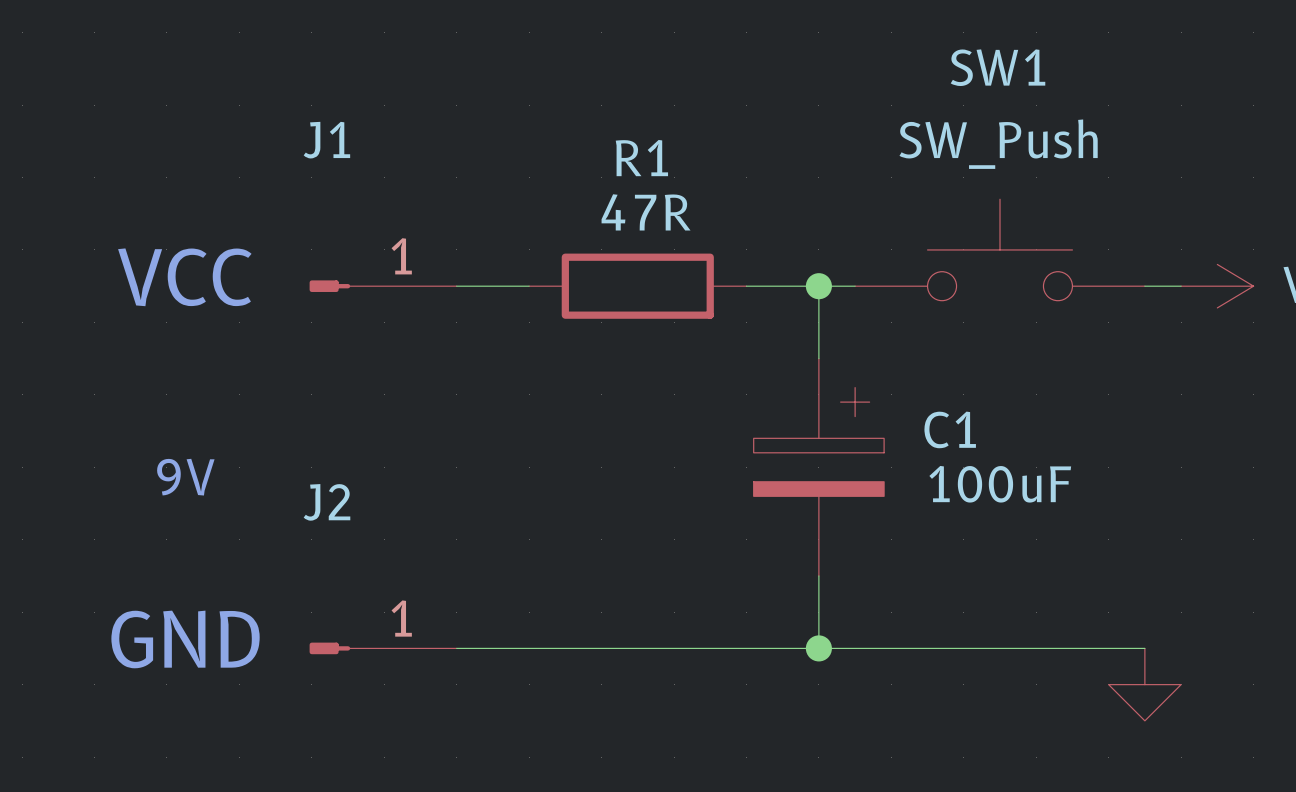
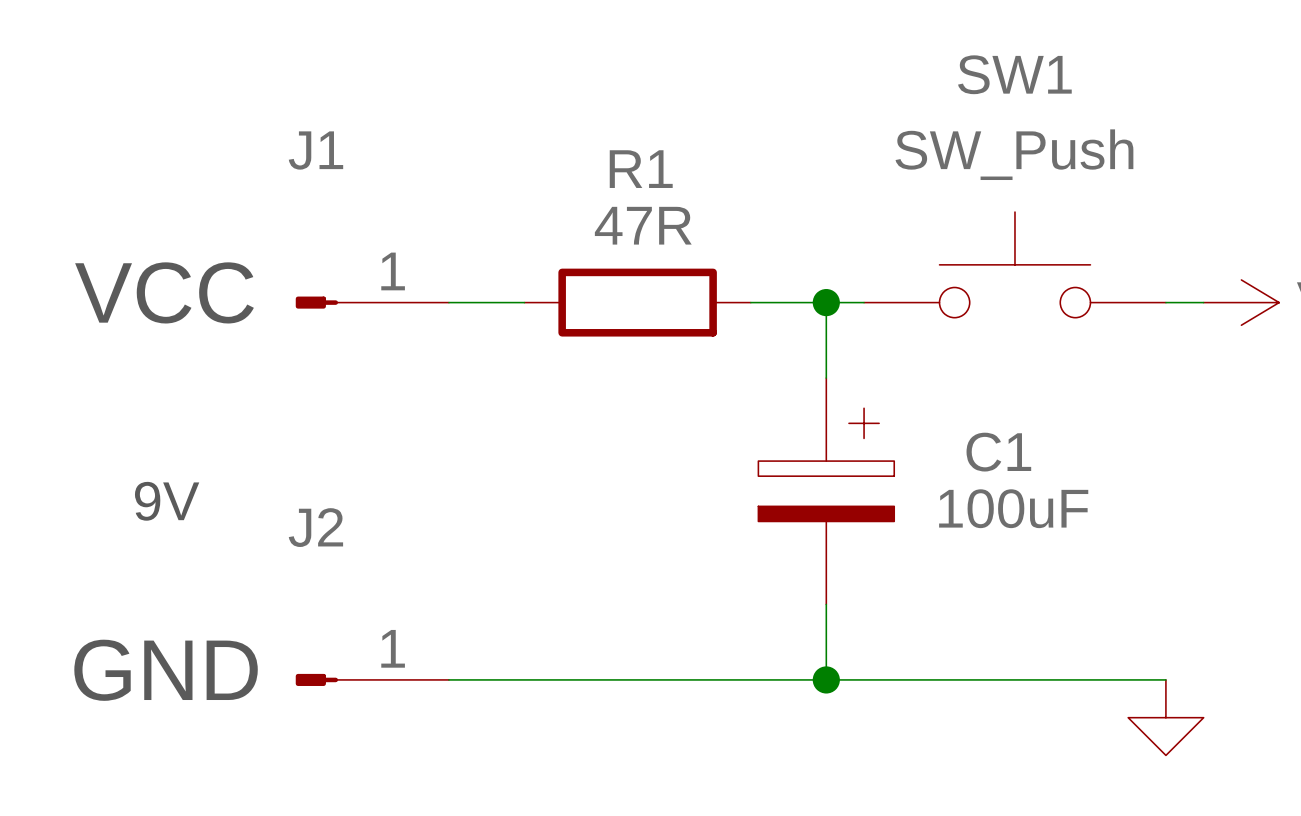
C1 name position: C1 (950, 429) -> C1 (998, 452)

